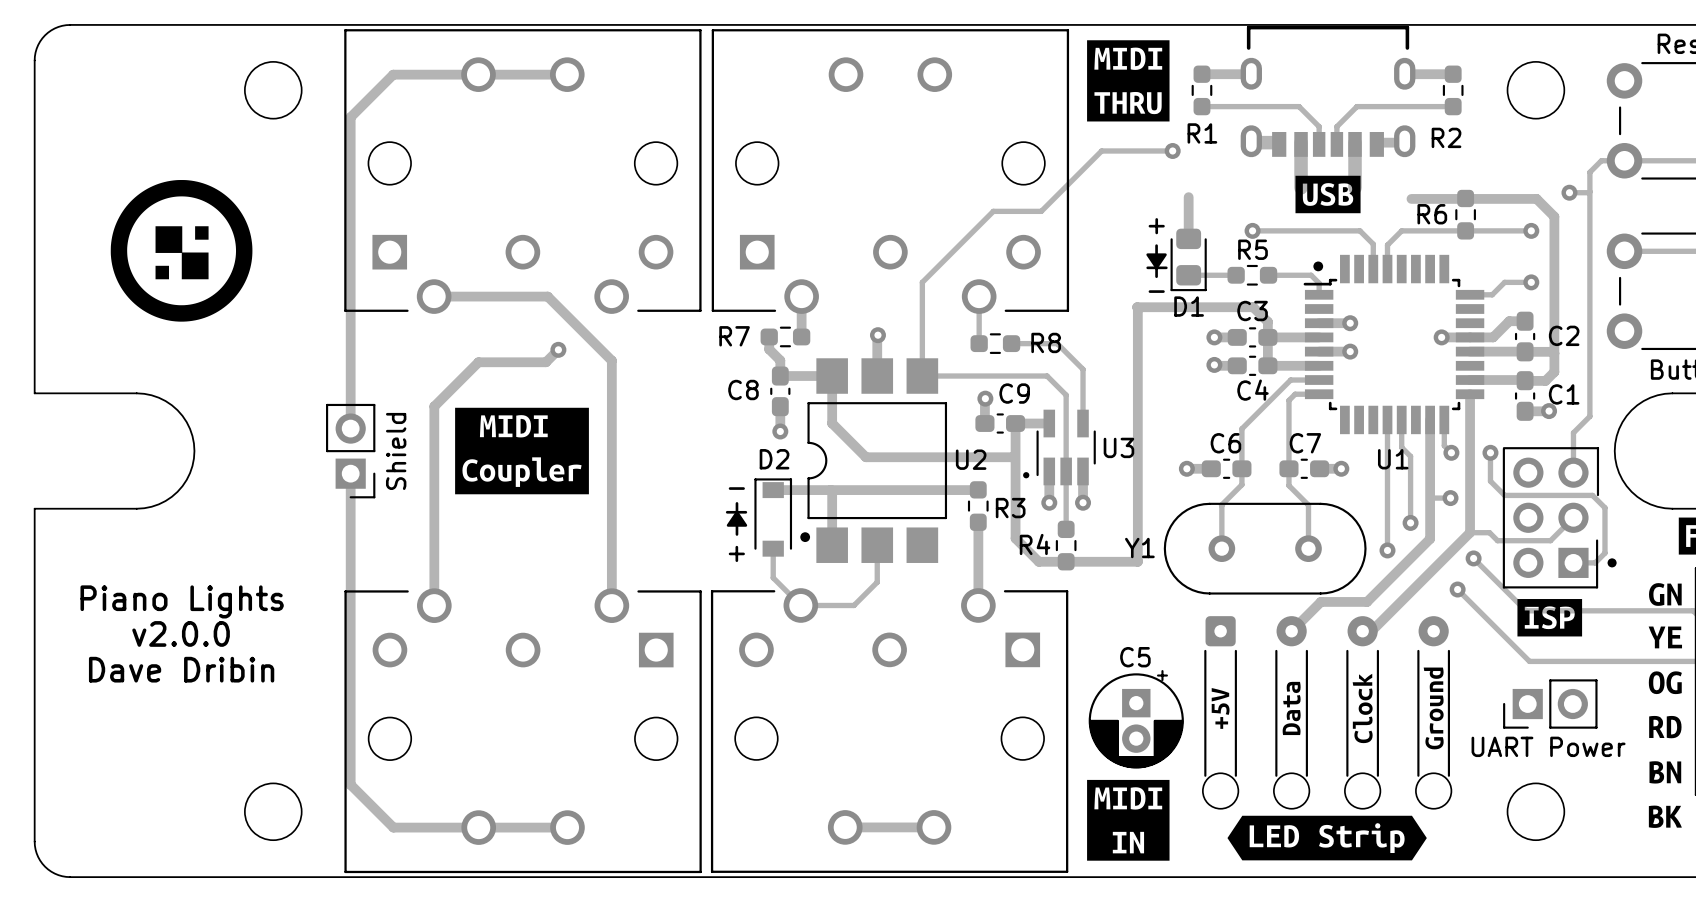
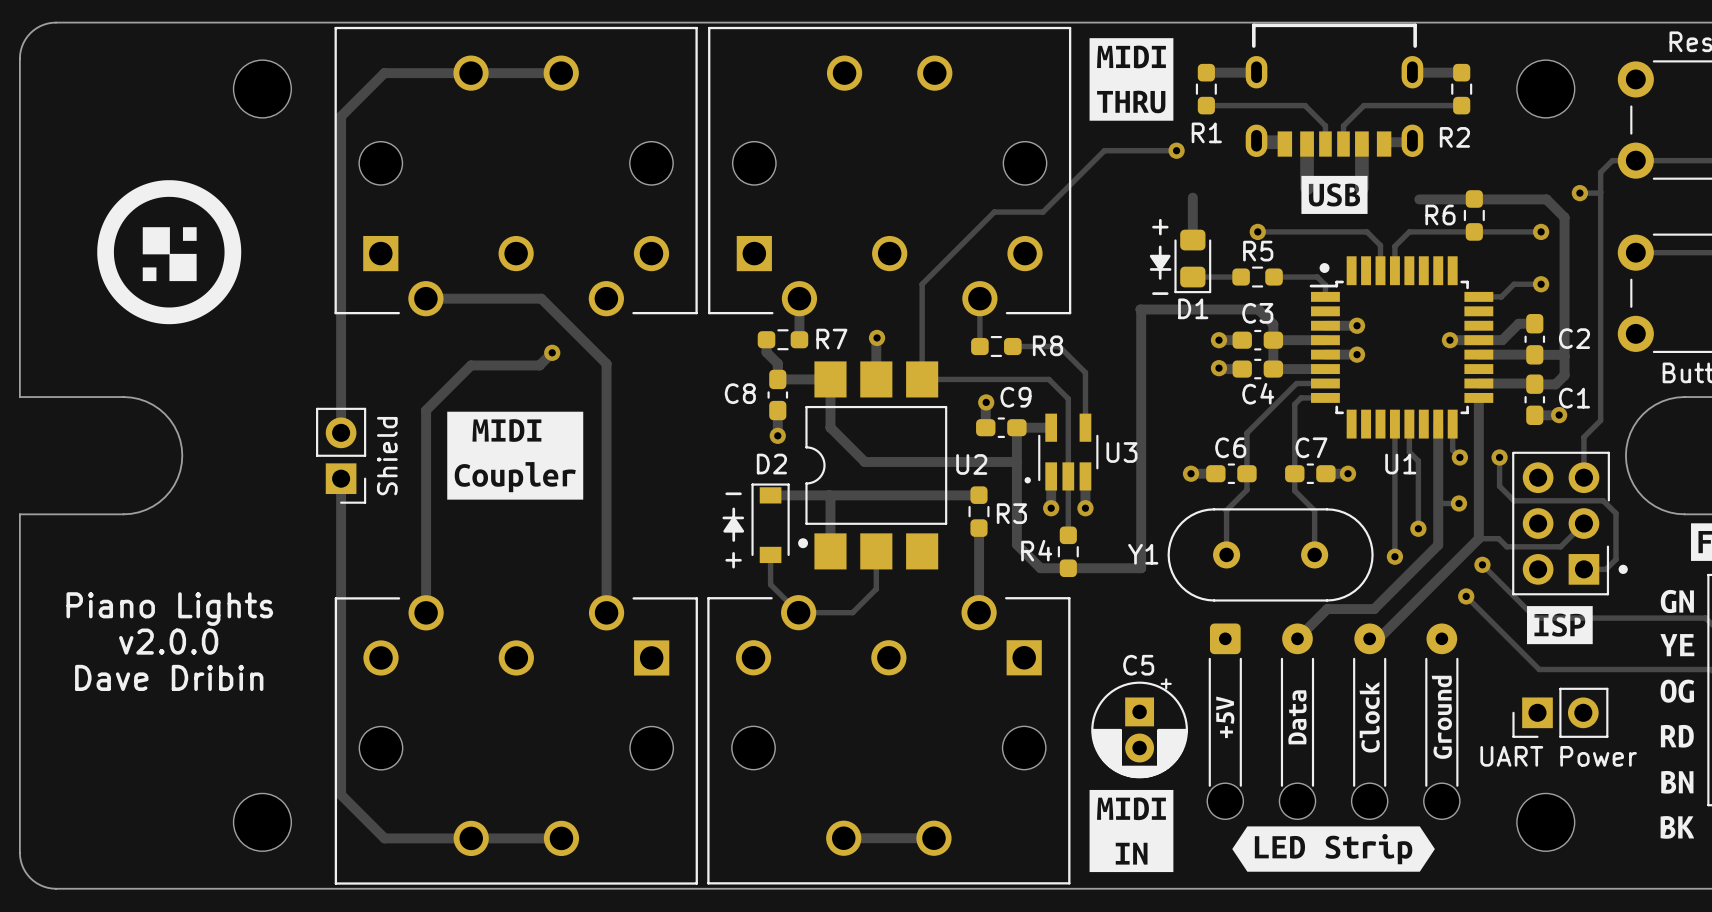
R7 name position: R7 (734, 336) -> R7 (831, 339)

